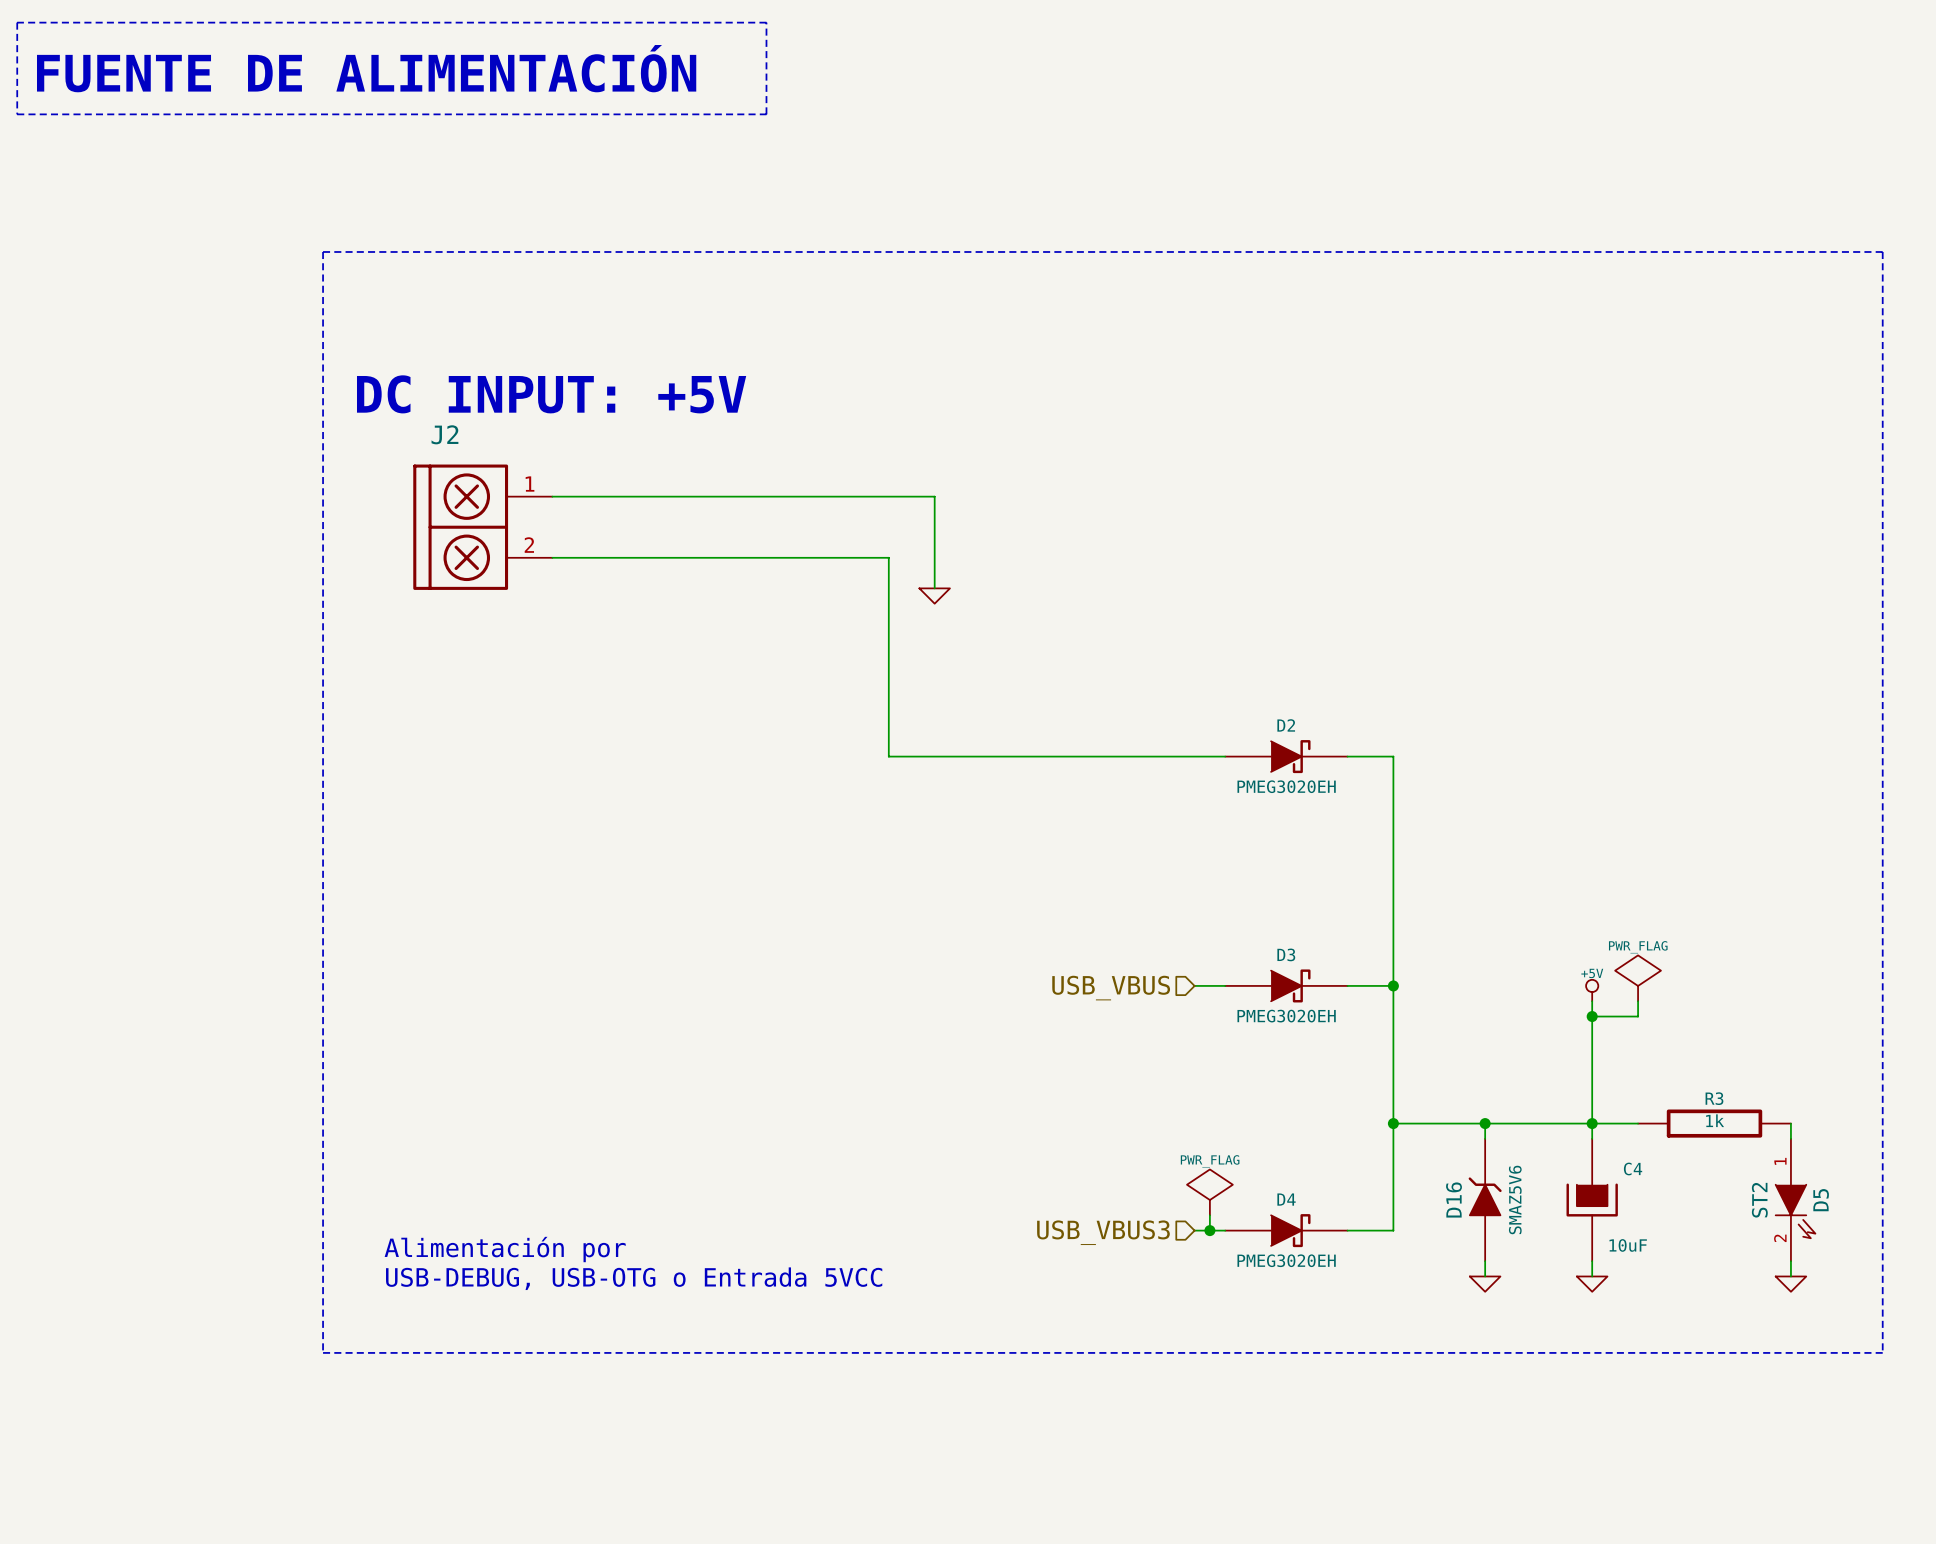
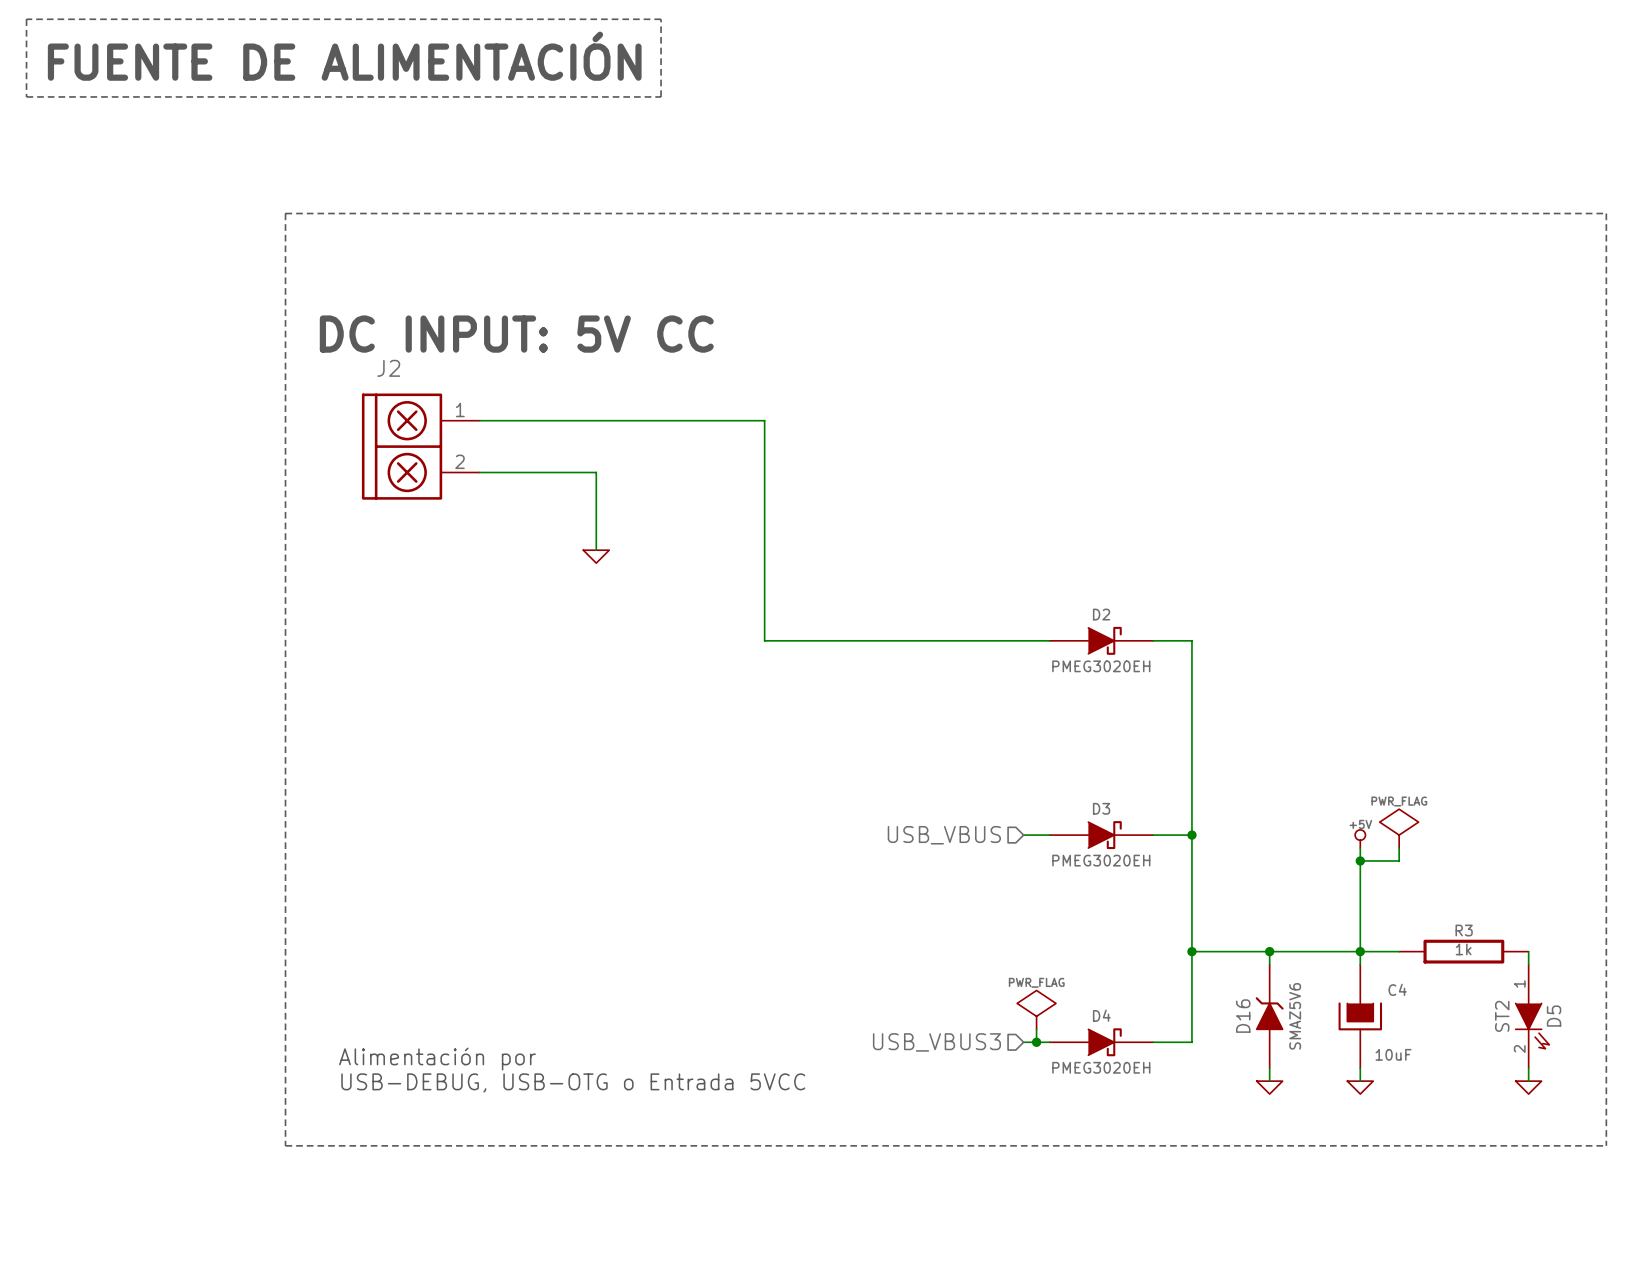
text: DC INPUT: +5V (551, 394) -> DC INPUT: 5V CC (516, 334)
wire: (888, 496) (934, 496) (934, 588) -> (764, 420) (764, 472)
wire: (690, 557) (888, 557) -> (596, 472) (596, 550)
power symbol position: (934, 596) -> (596, 556)

